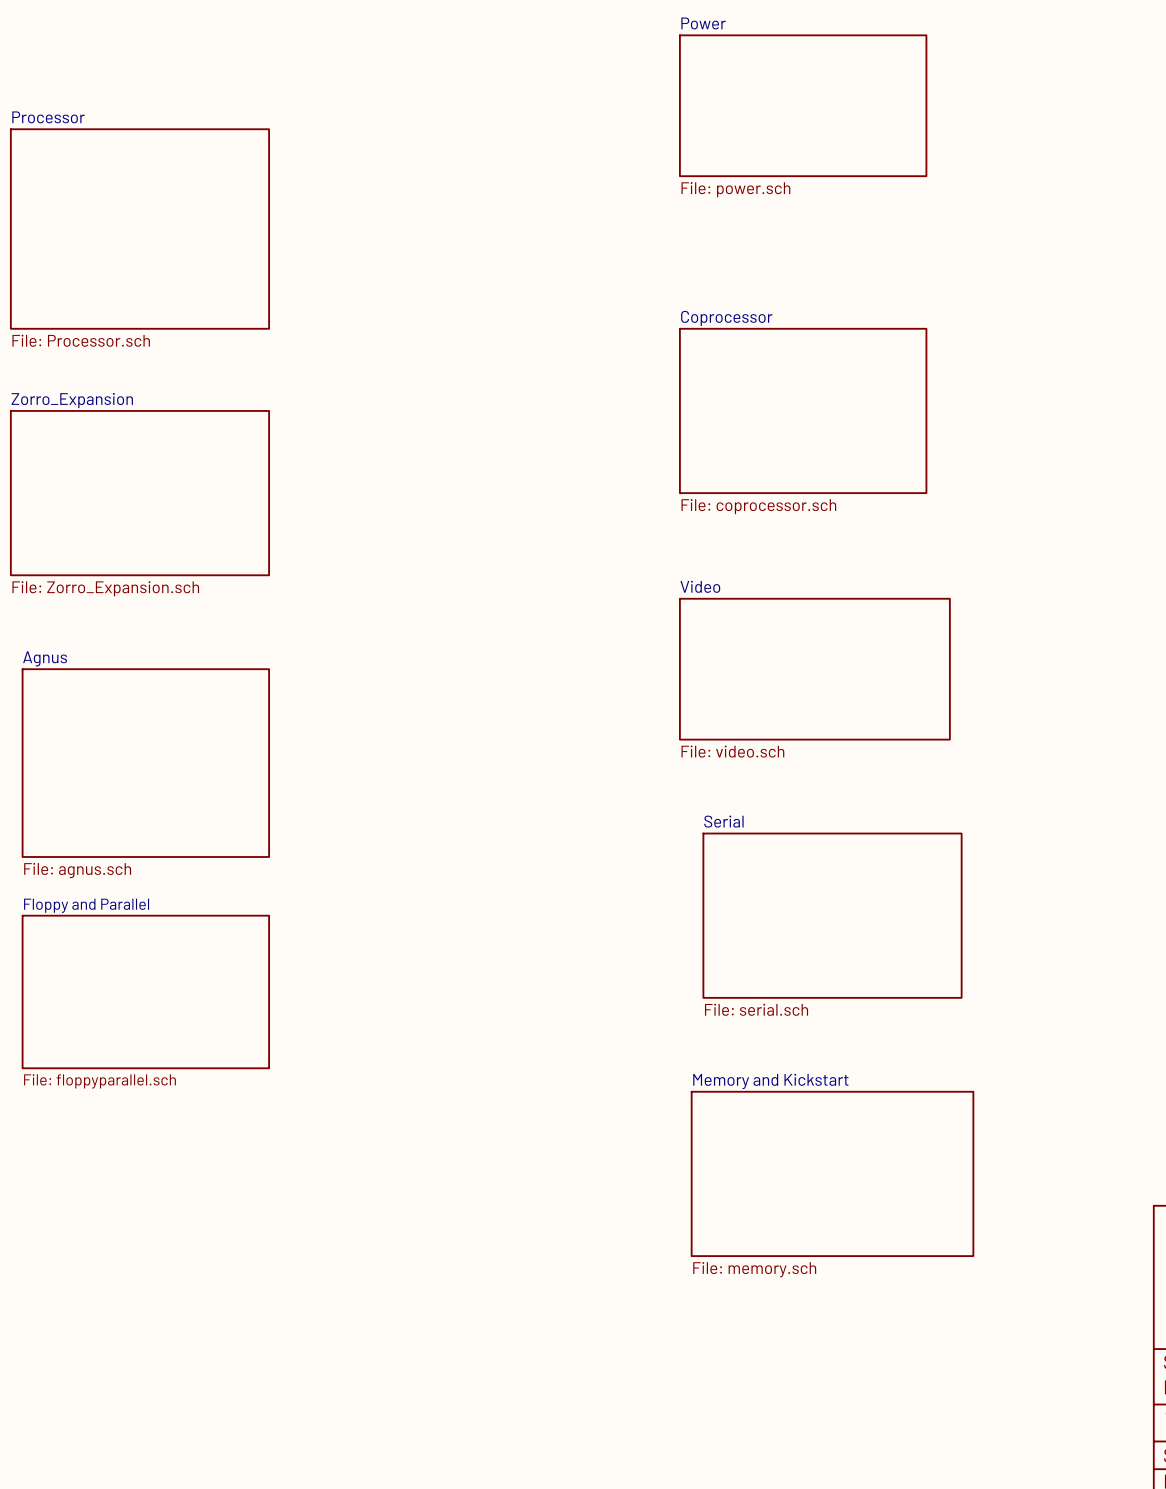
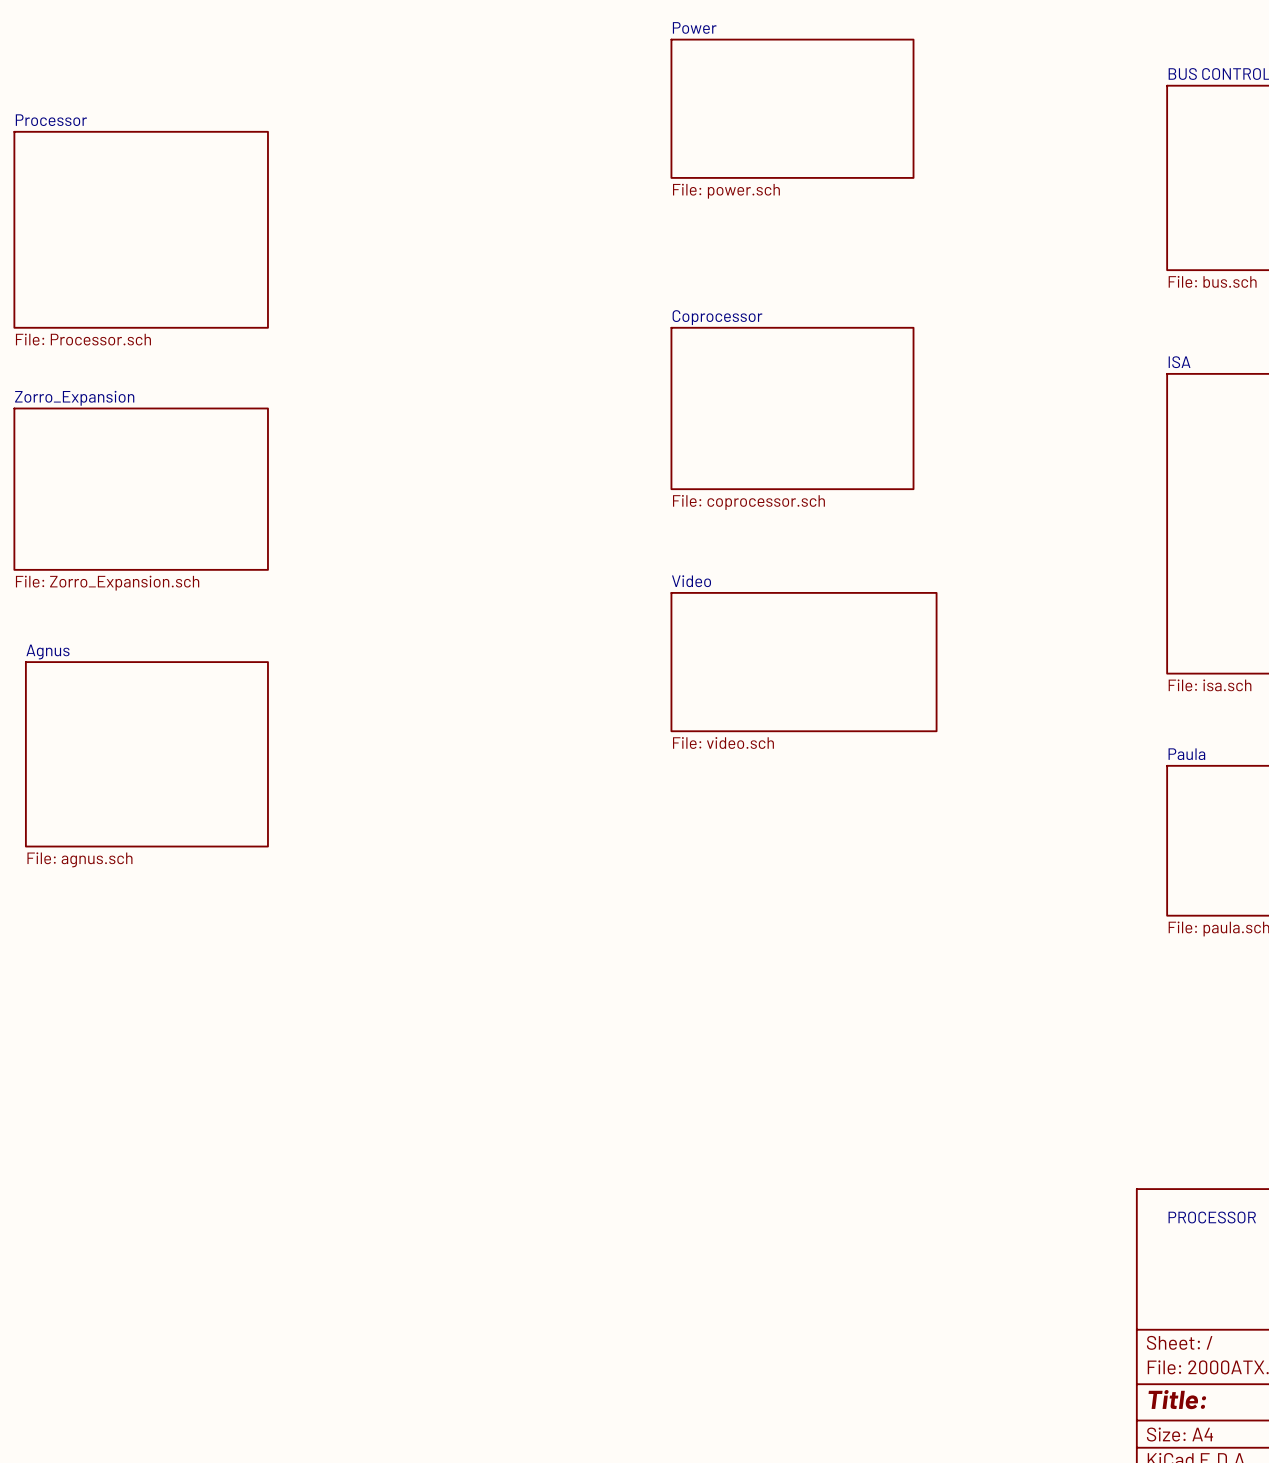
sheet Serial: File: serial.sch (832, 915) -> none
sheet Floppy and Parallel: File: floppyparallel.sch (145, 991) -> none
sheet Memory and Kickstart: File: memory.sch (832, 1173) -> none

